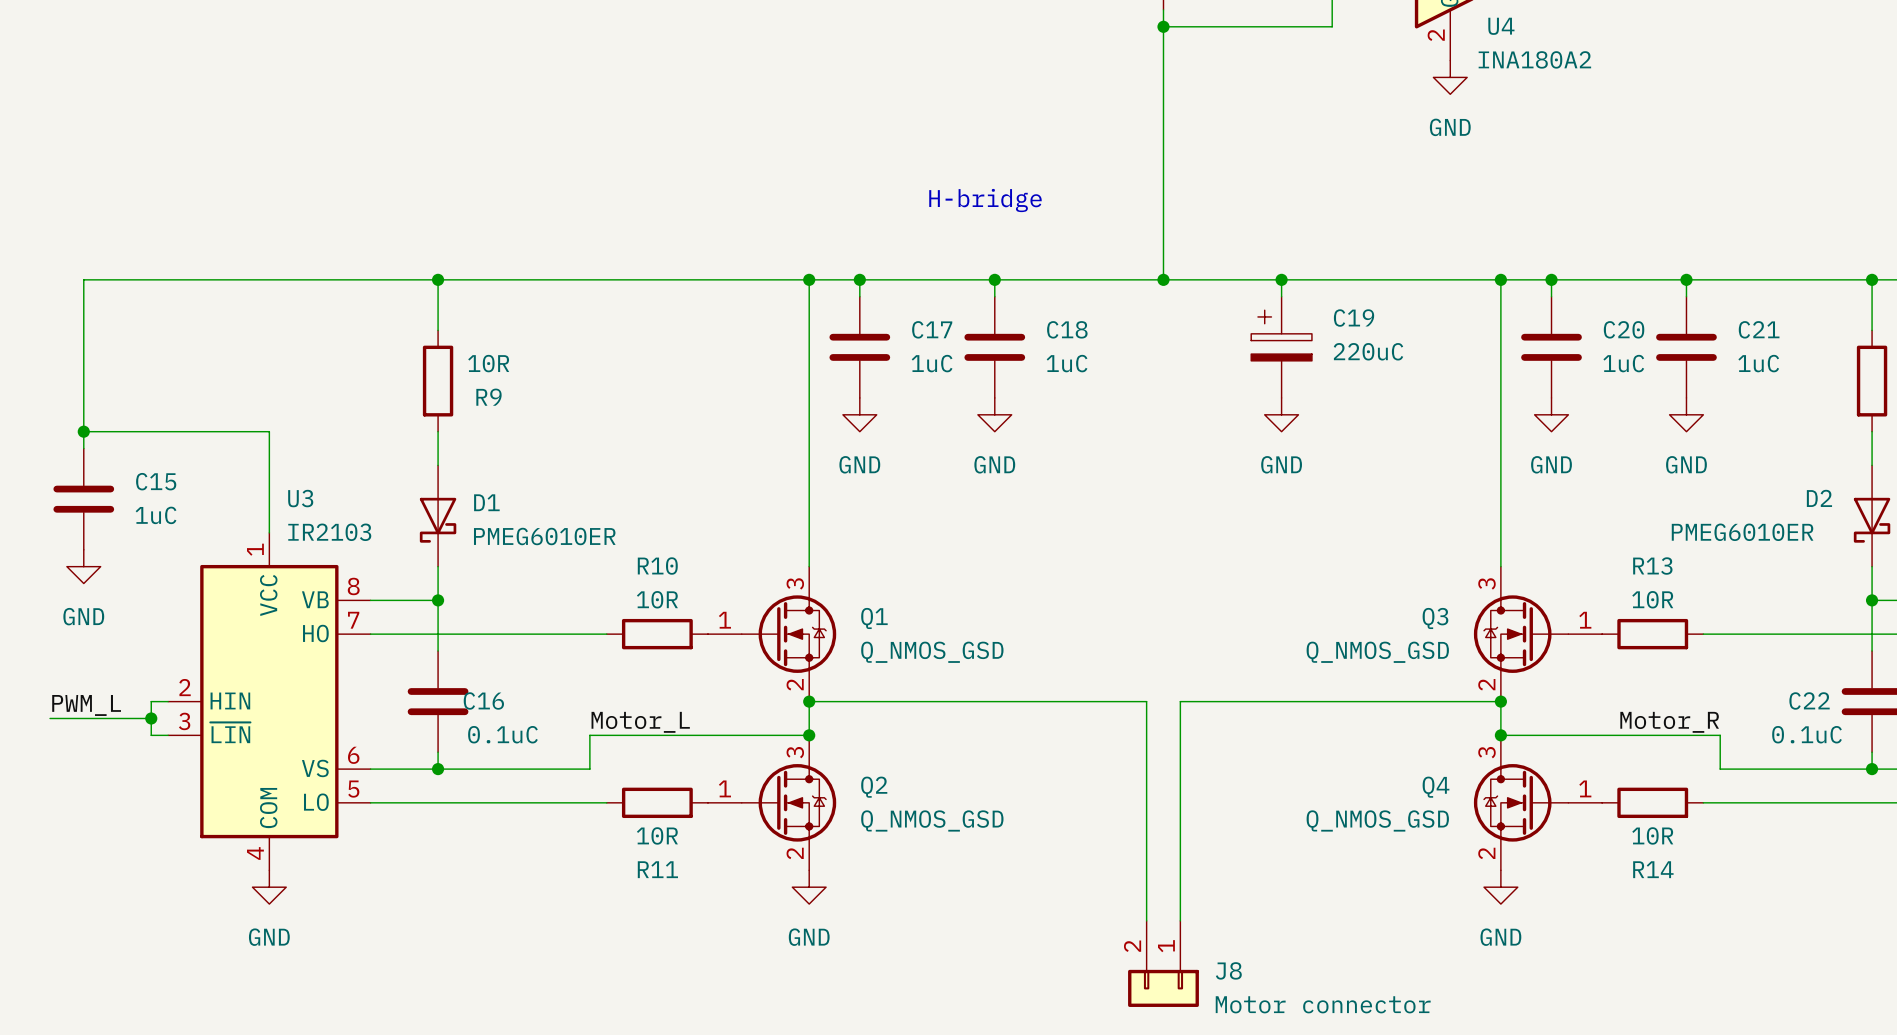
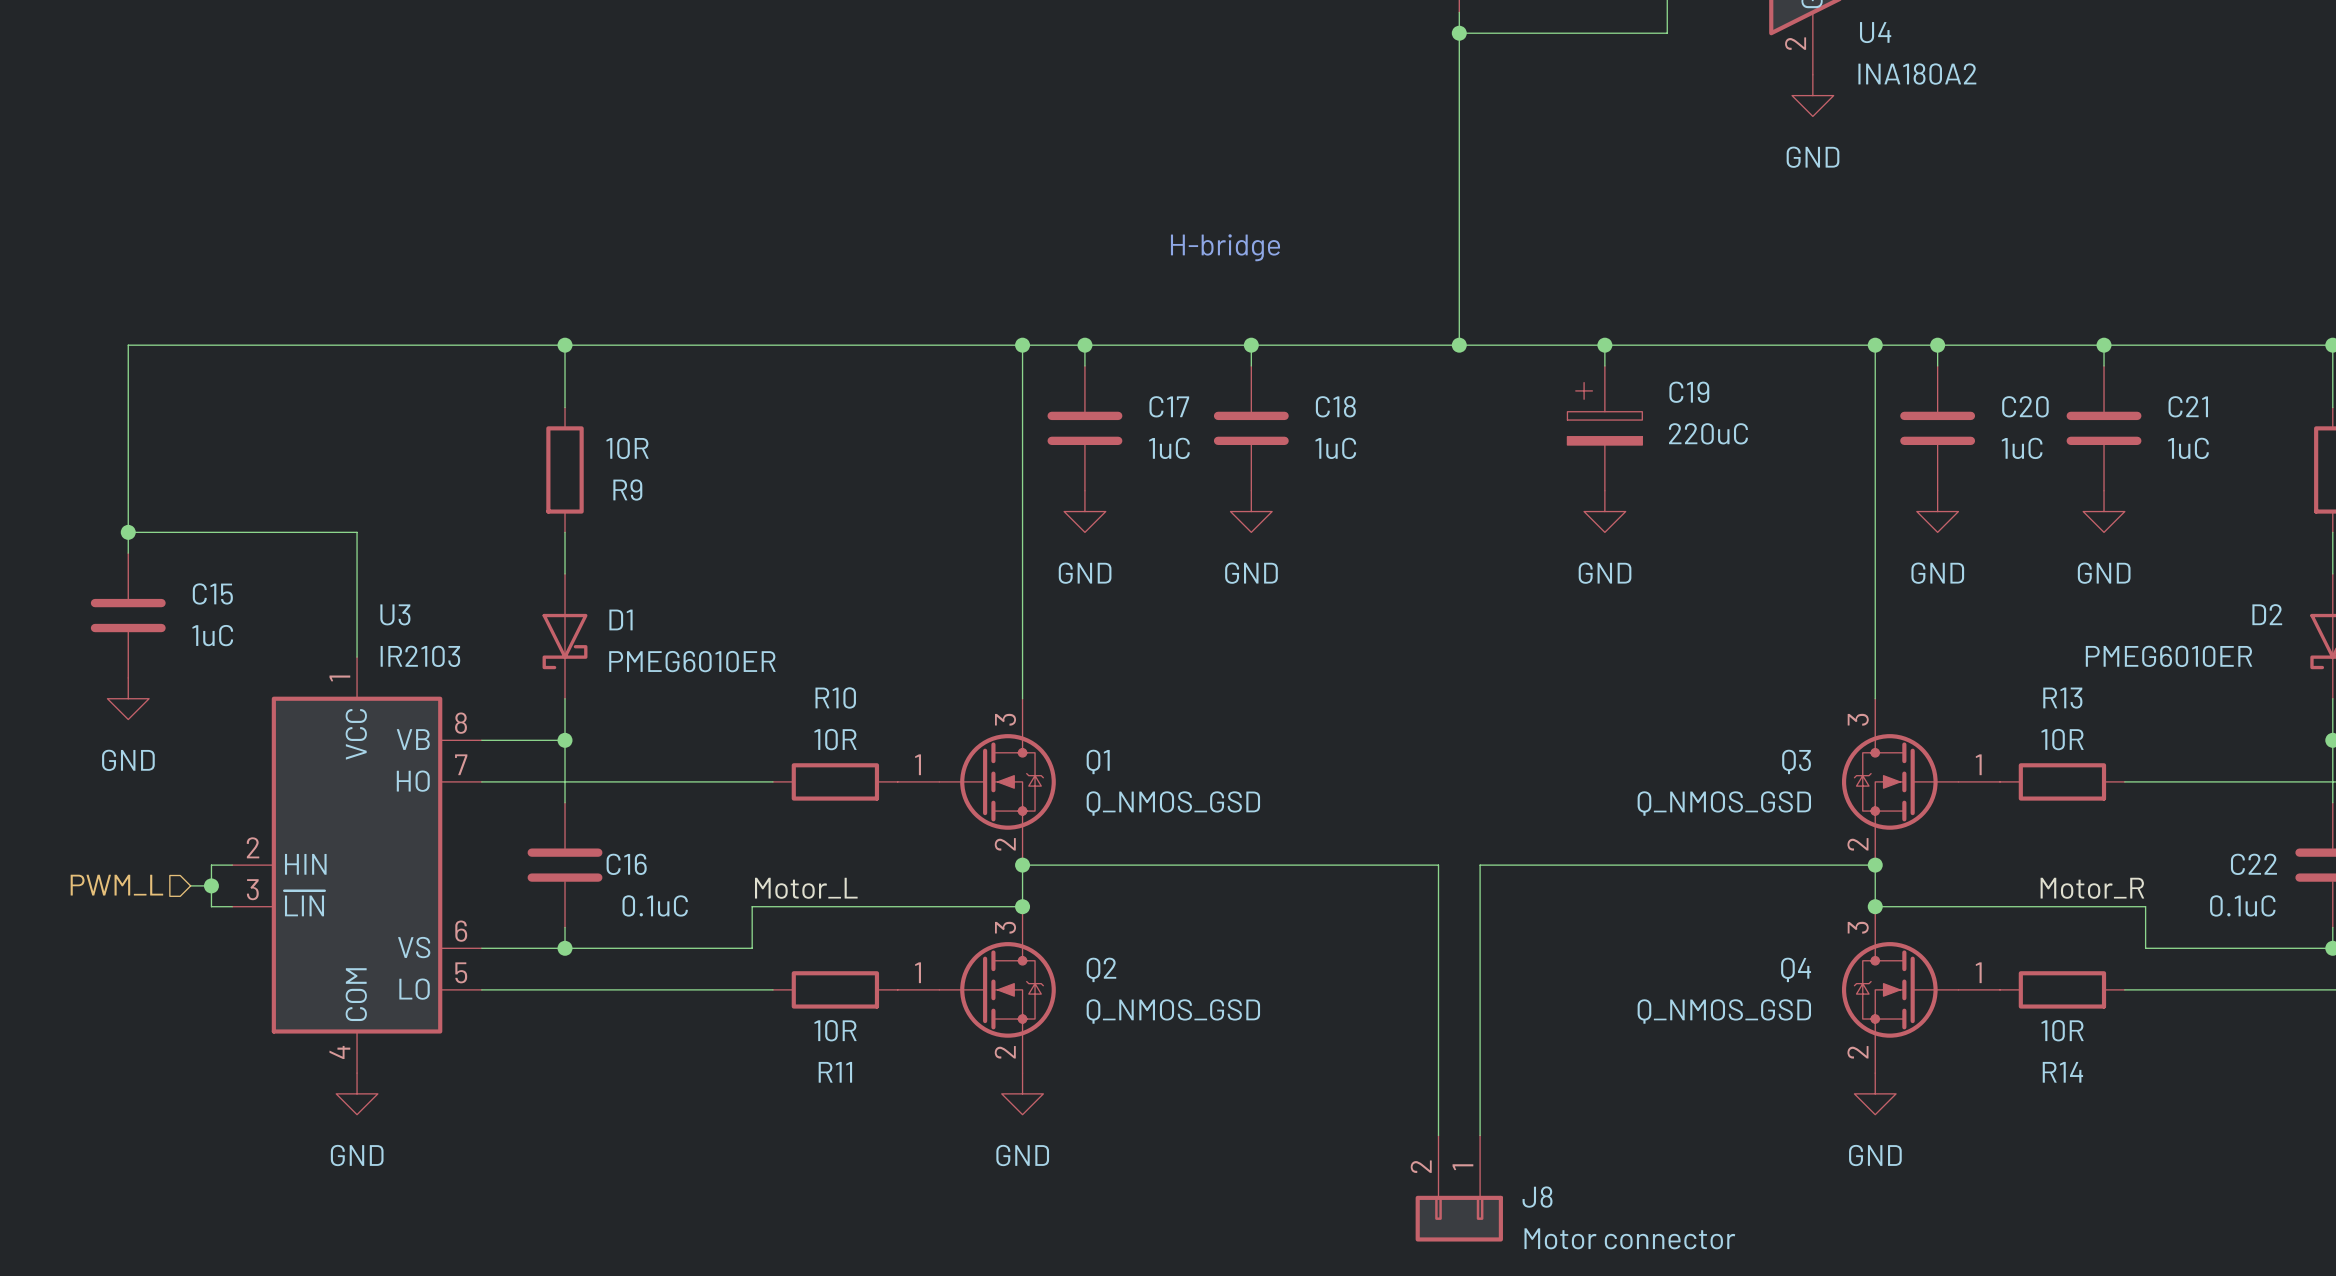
label: PWM_L (86, 705) -> none
wire: (50, 718) (134, 718) -> none
hierarchical label: none -> PWM_L (116, 885)

